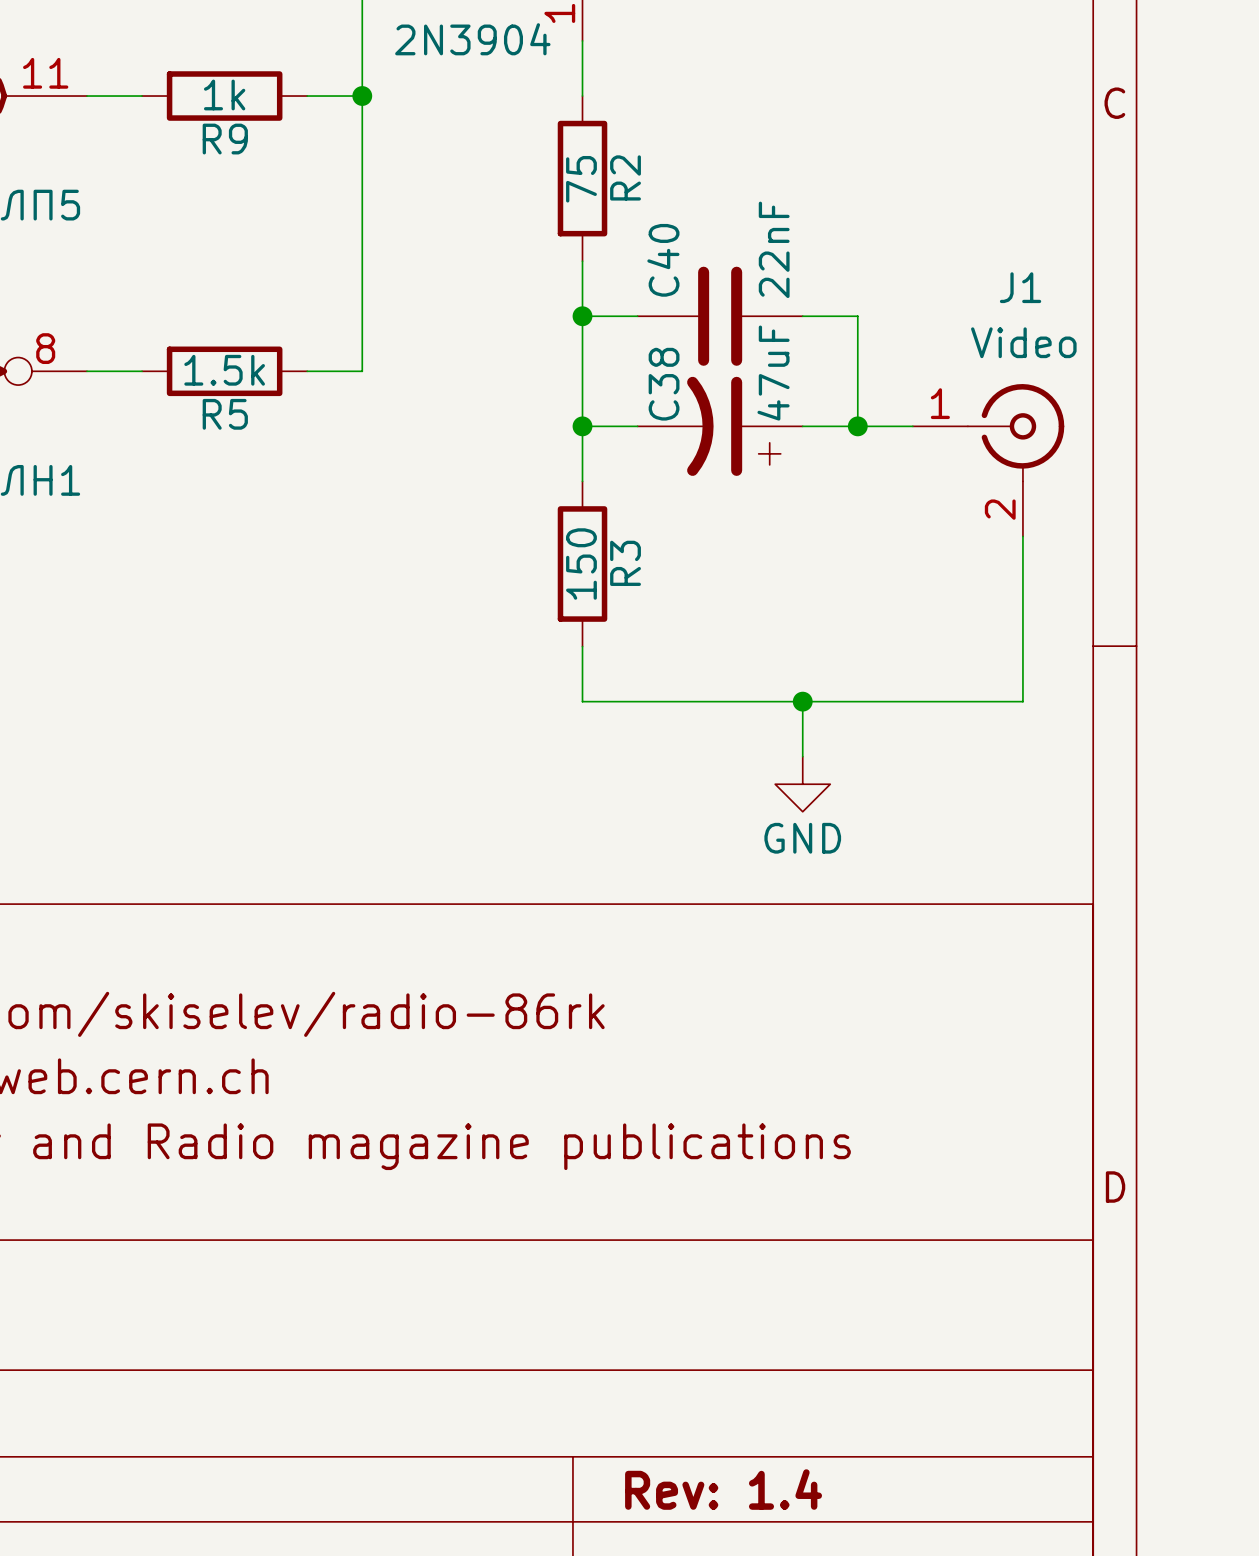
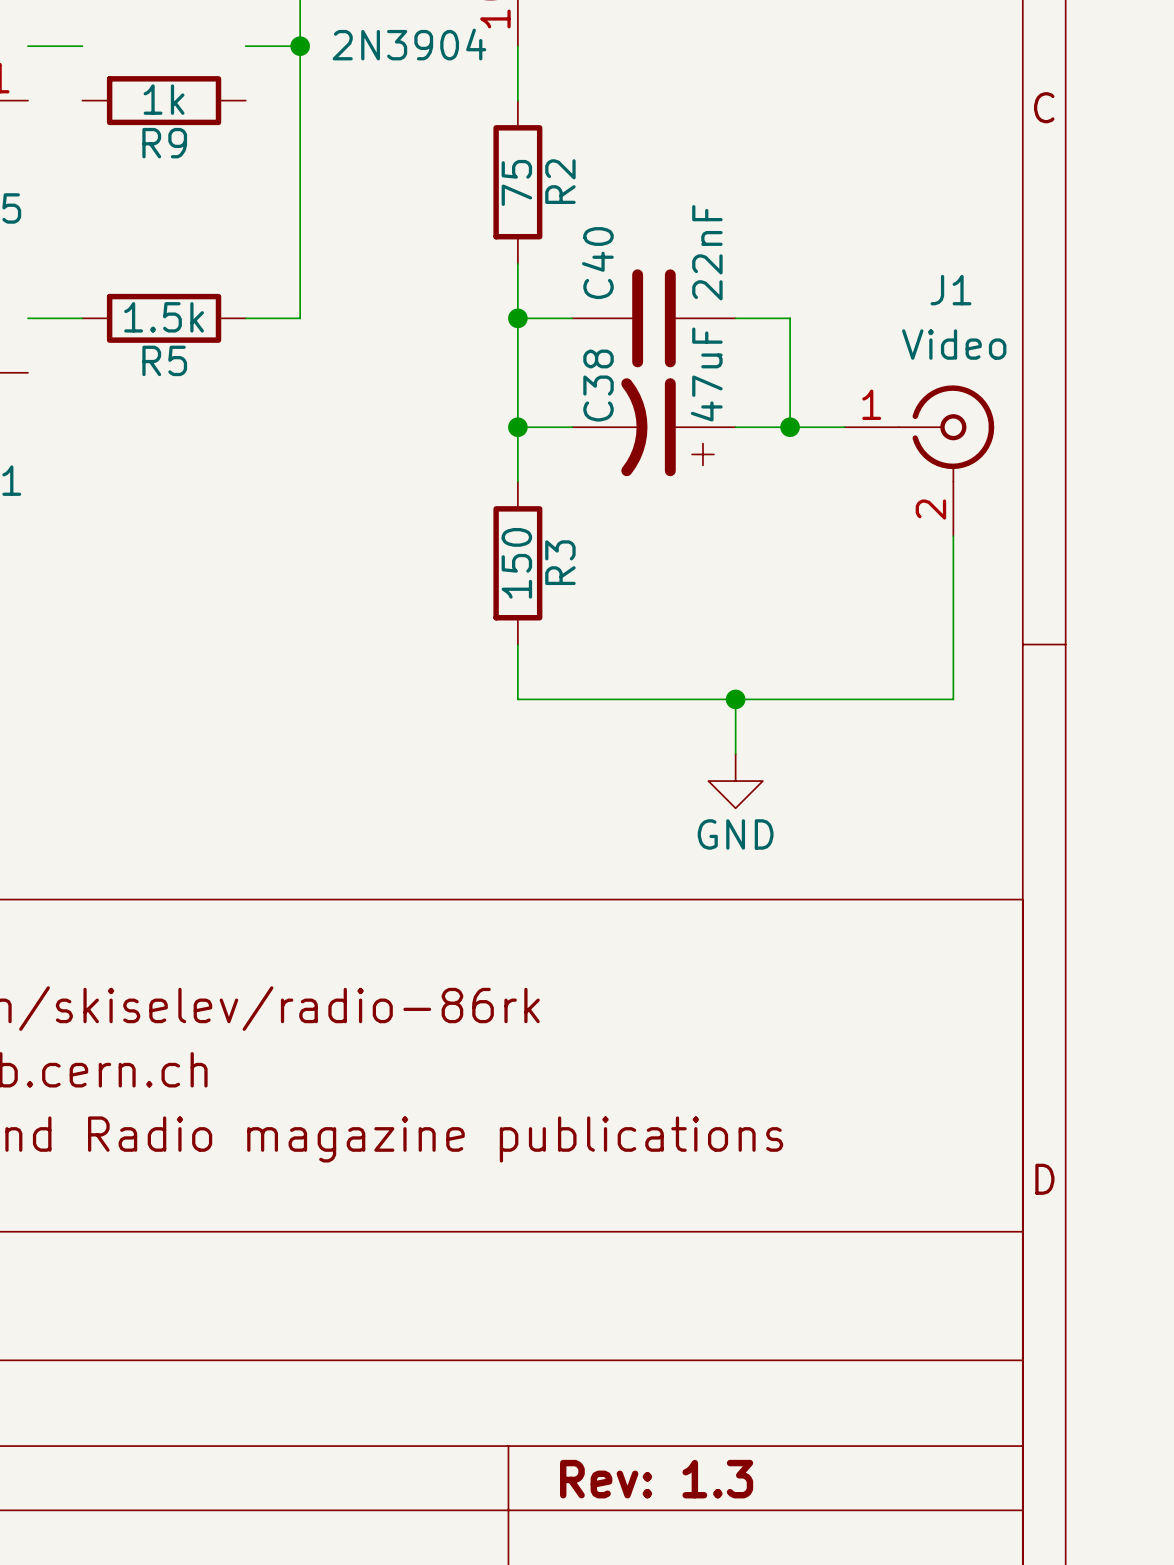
wire: (86, 96) (142, 96) -> (27, 46) (82, 46)
wire: (307, 96) (362, 96) -> (245, 46) (300, 46)
junction position: (362, 96) -> (300, 46)
wire: (362, 316) (362, 371) (307, 371) -> (300, 318) (245, 318)
wire: (86, 371) (142, 371) -> (27, 318) (82, 318)
R5 position: (224, 371) -> (164, 318)
title block: Rev: 1.4 (723, 1489) -> Rev: 1.3 (656, 1479)

